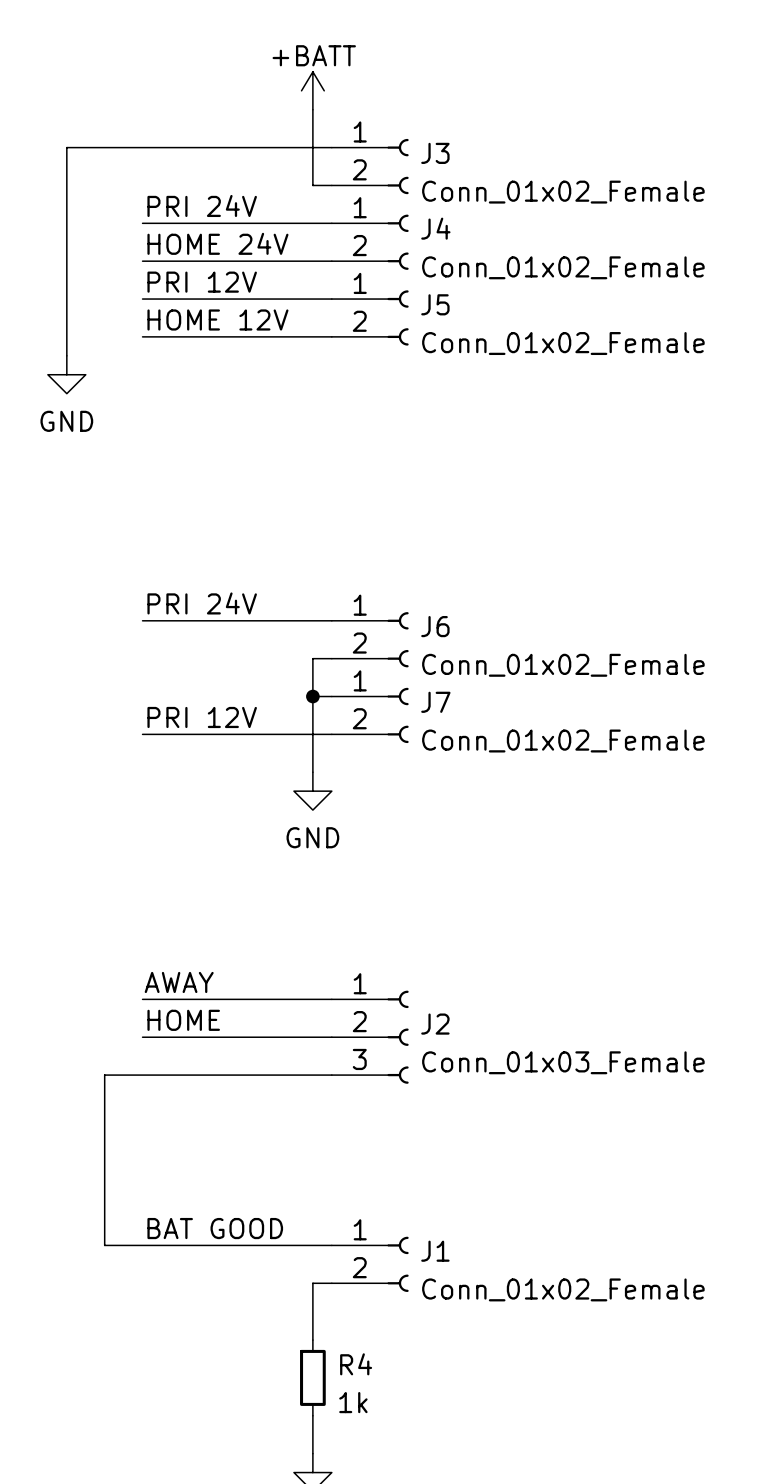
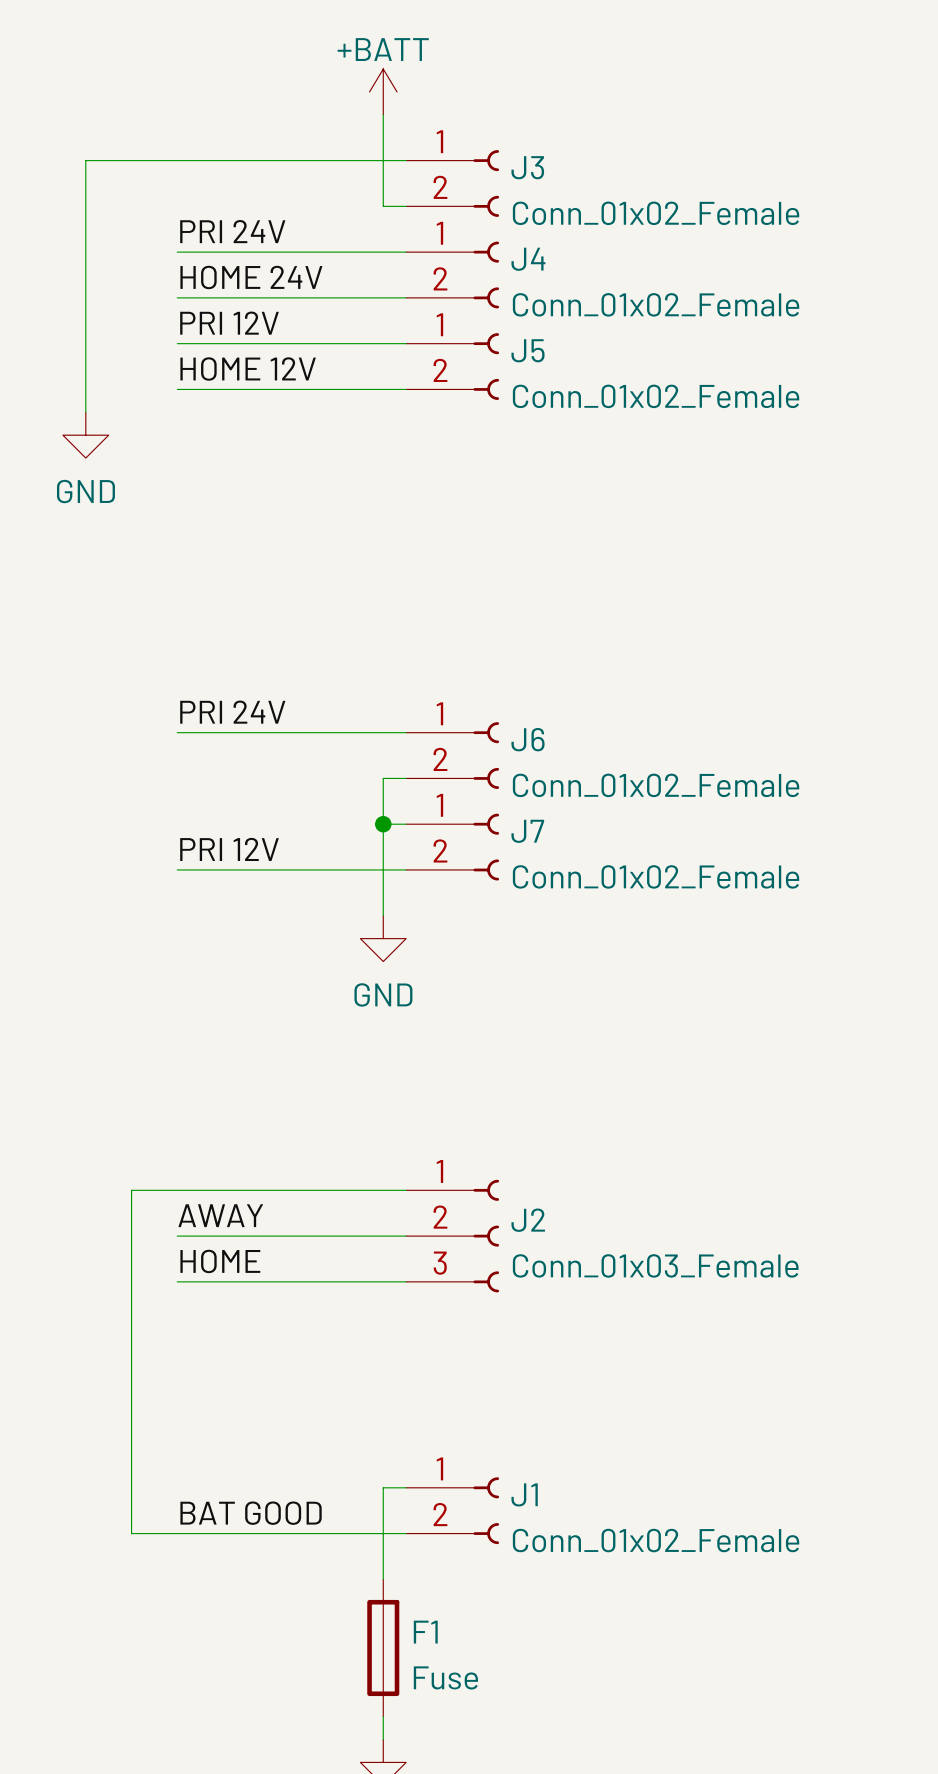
label: AWAY (179, 982) -> none
label: HOME (183, 1020) -> AWAY (220, 1215)
label: none -> HOME (220, 1261)
wire: (104, 1075) (142, 1075) -> (131, 1281) (131, 1190) (177, 1190)
label position: BAT GOOD (215, 1228) -> BAT GOOD (251, 1513)
wire: (104, 1245) (312, 1245) -> (131, 1487) (131, 1533) (383, 1533) (383, 1487)
R4: 1k (312, 1377) -> none
F1: none -> Fuse (383, 1647)

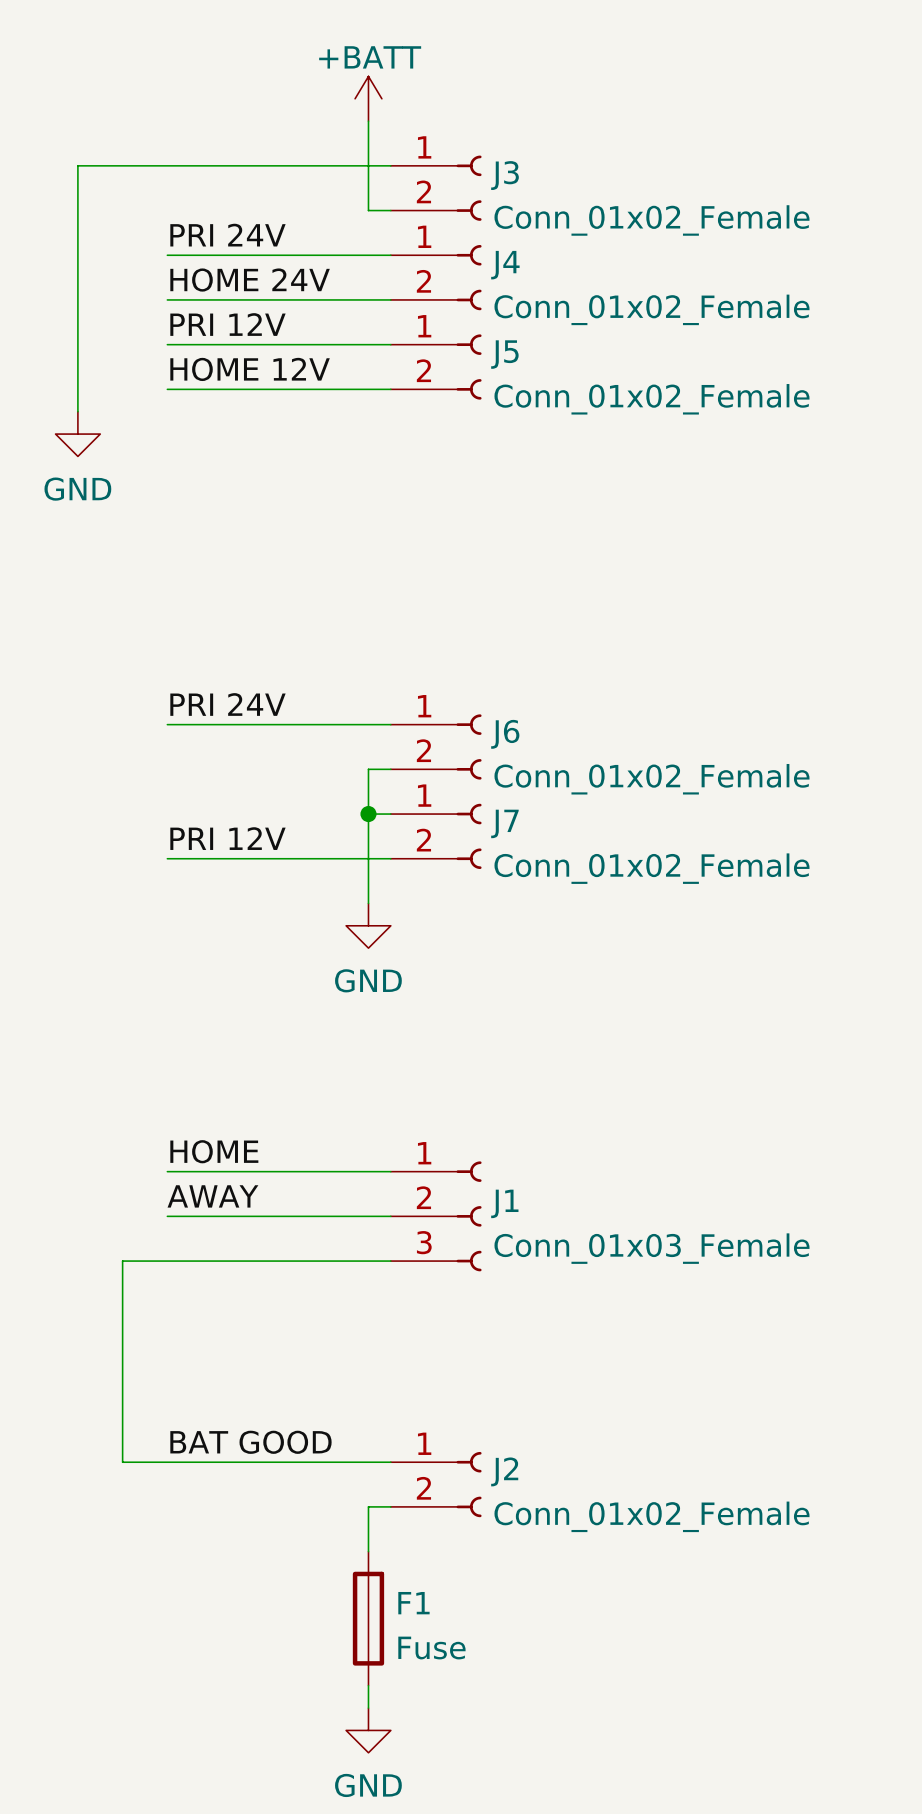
wire: (177, 1190) (131, 1190) (131, 1281) -> (167, 1261) (122, 1261)
J2 name: J2 (528, 1220) -> J1 (504, 1203)
label position: HOME (220, 1261) -> HOME (214, 1151)
wire: (131, 1487) (131, 1533) (383, 1533) (383, 1487) -> (122, 1462) (368, 1462)
J1 name: J1 (524, 1494) -> J2 (504, 1471)
label position: BAT GOOD (251, 1513) -> BAT GOOD (250, 1442)

